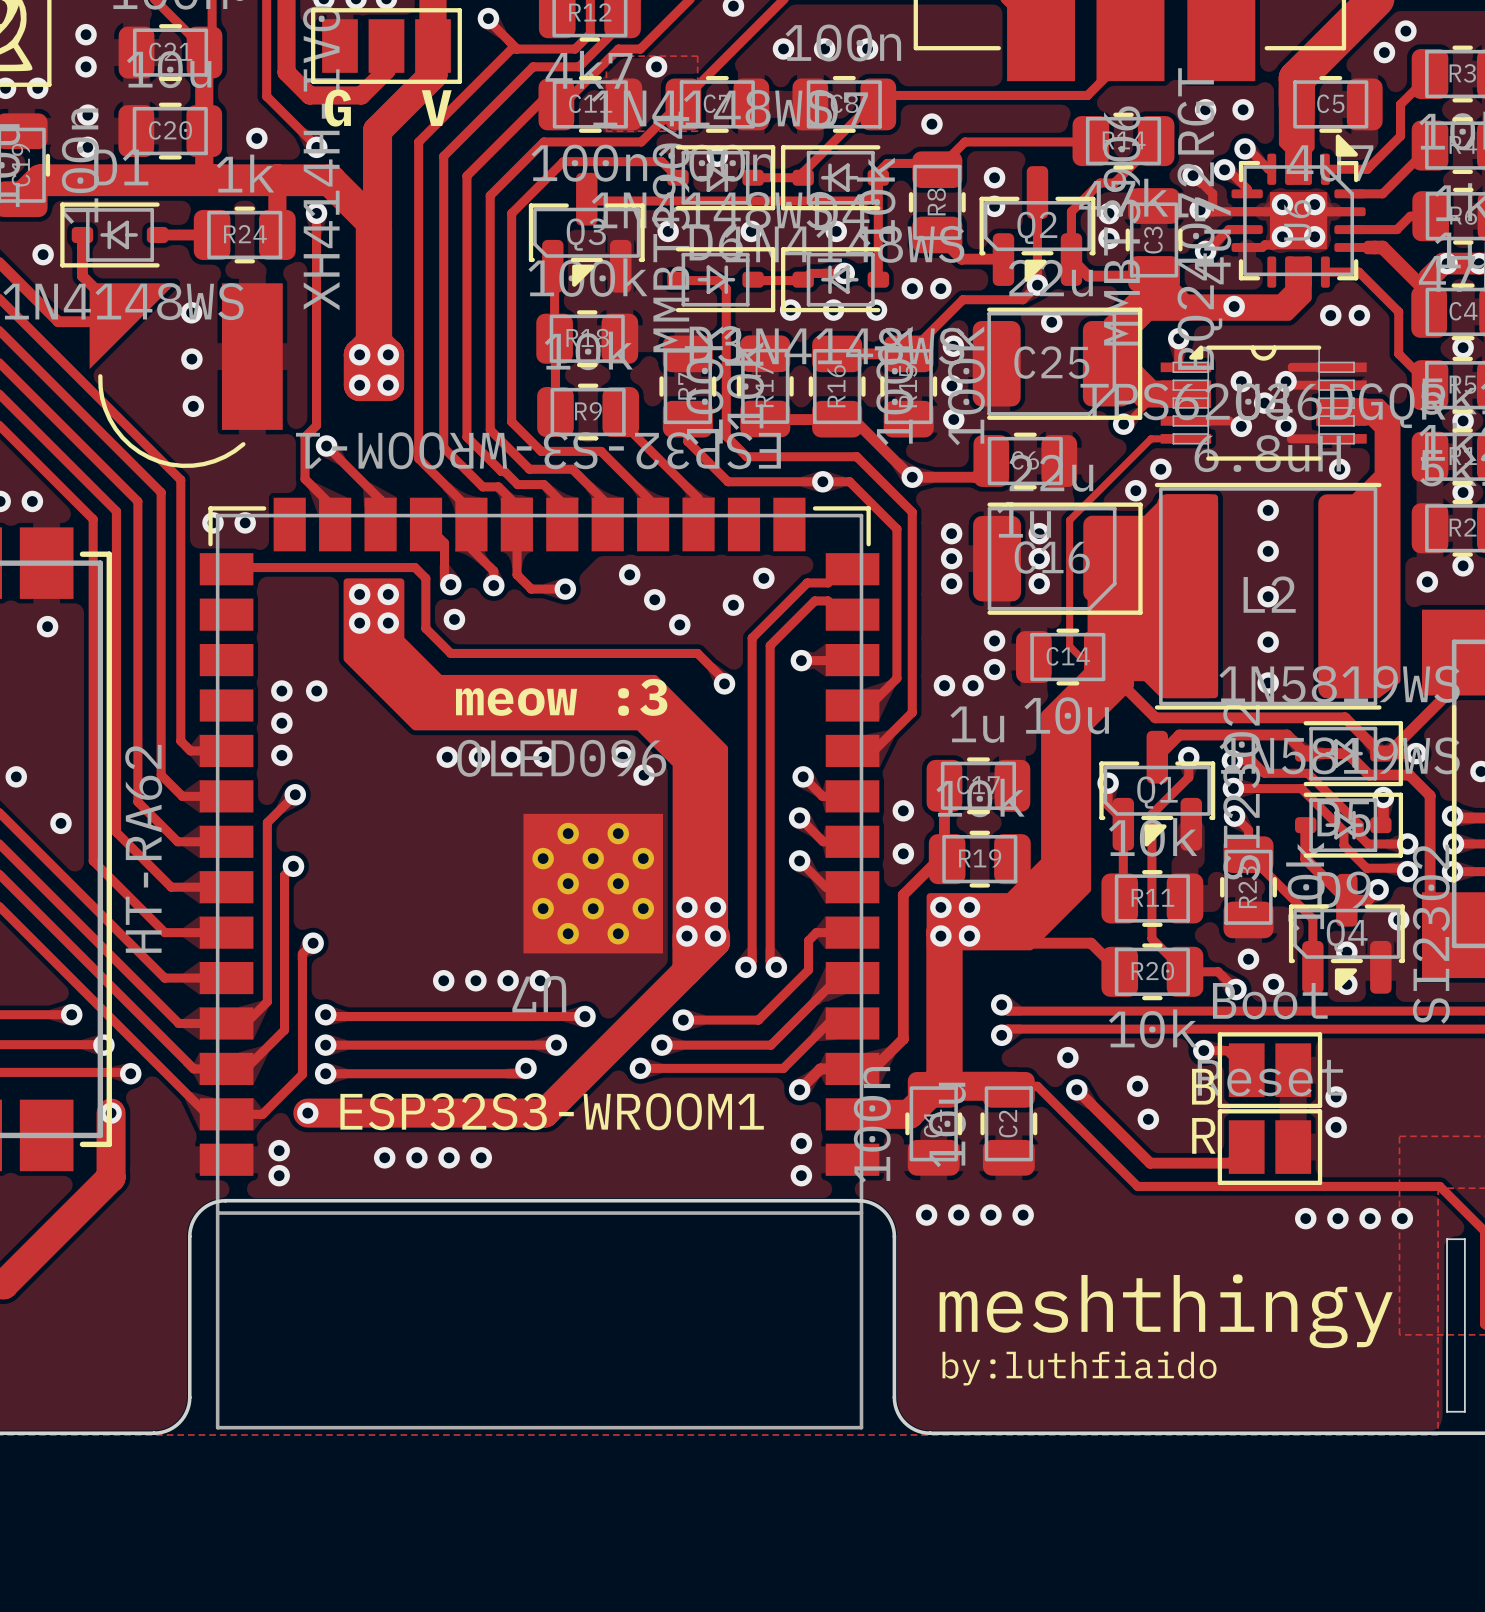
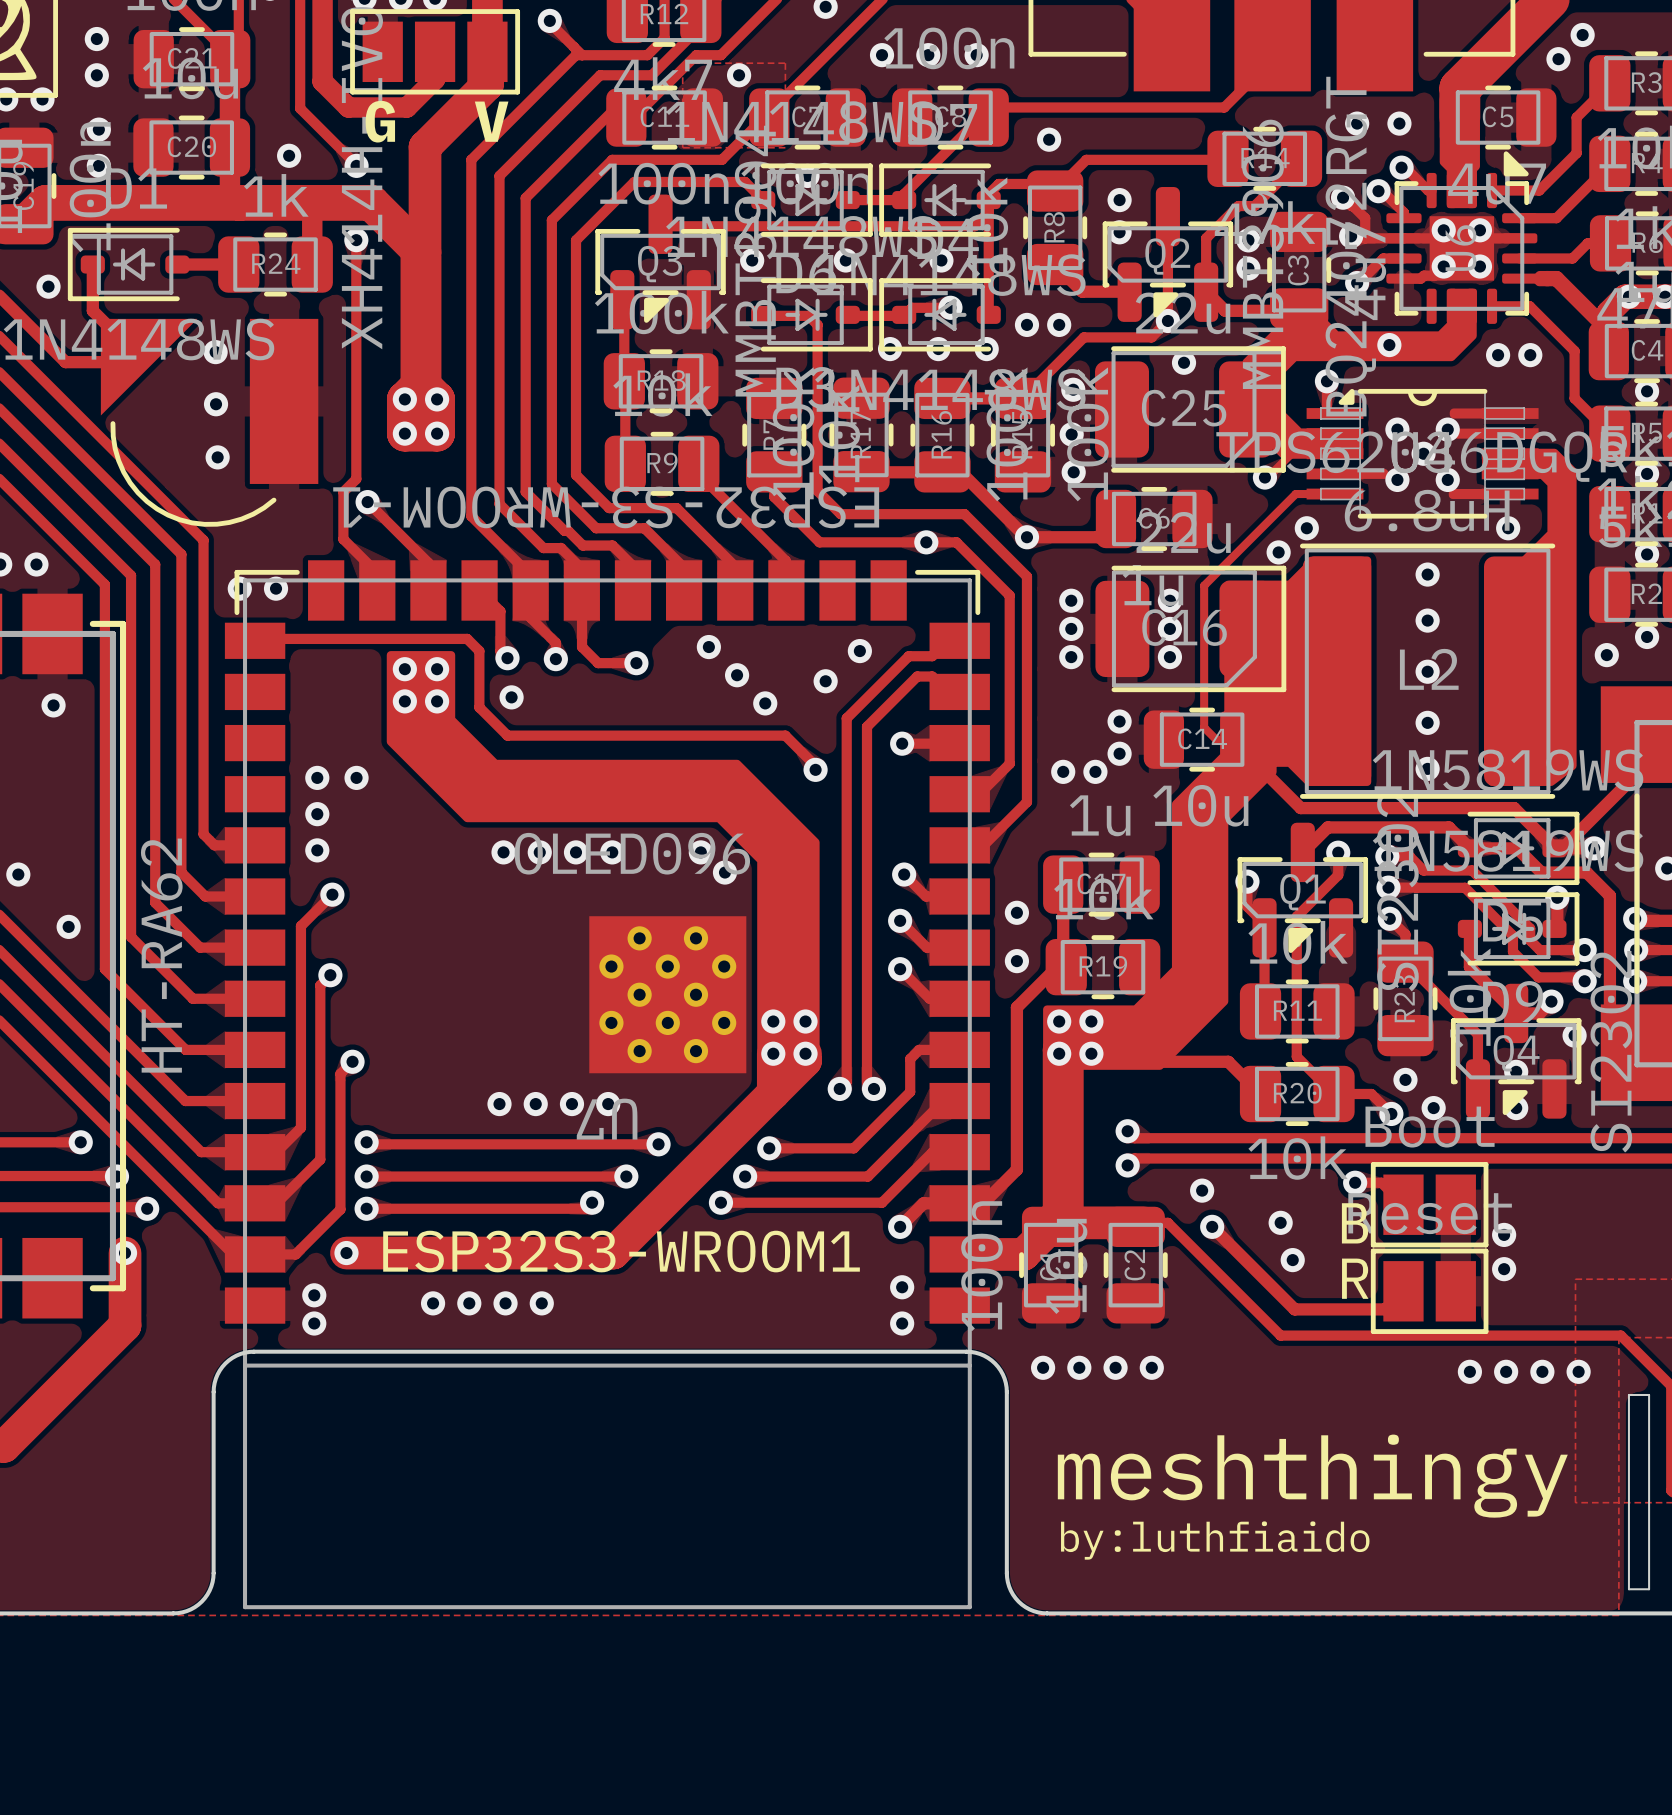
text: meow :3 (561, 697) -> none

